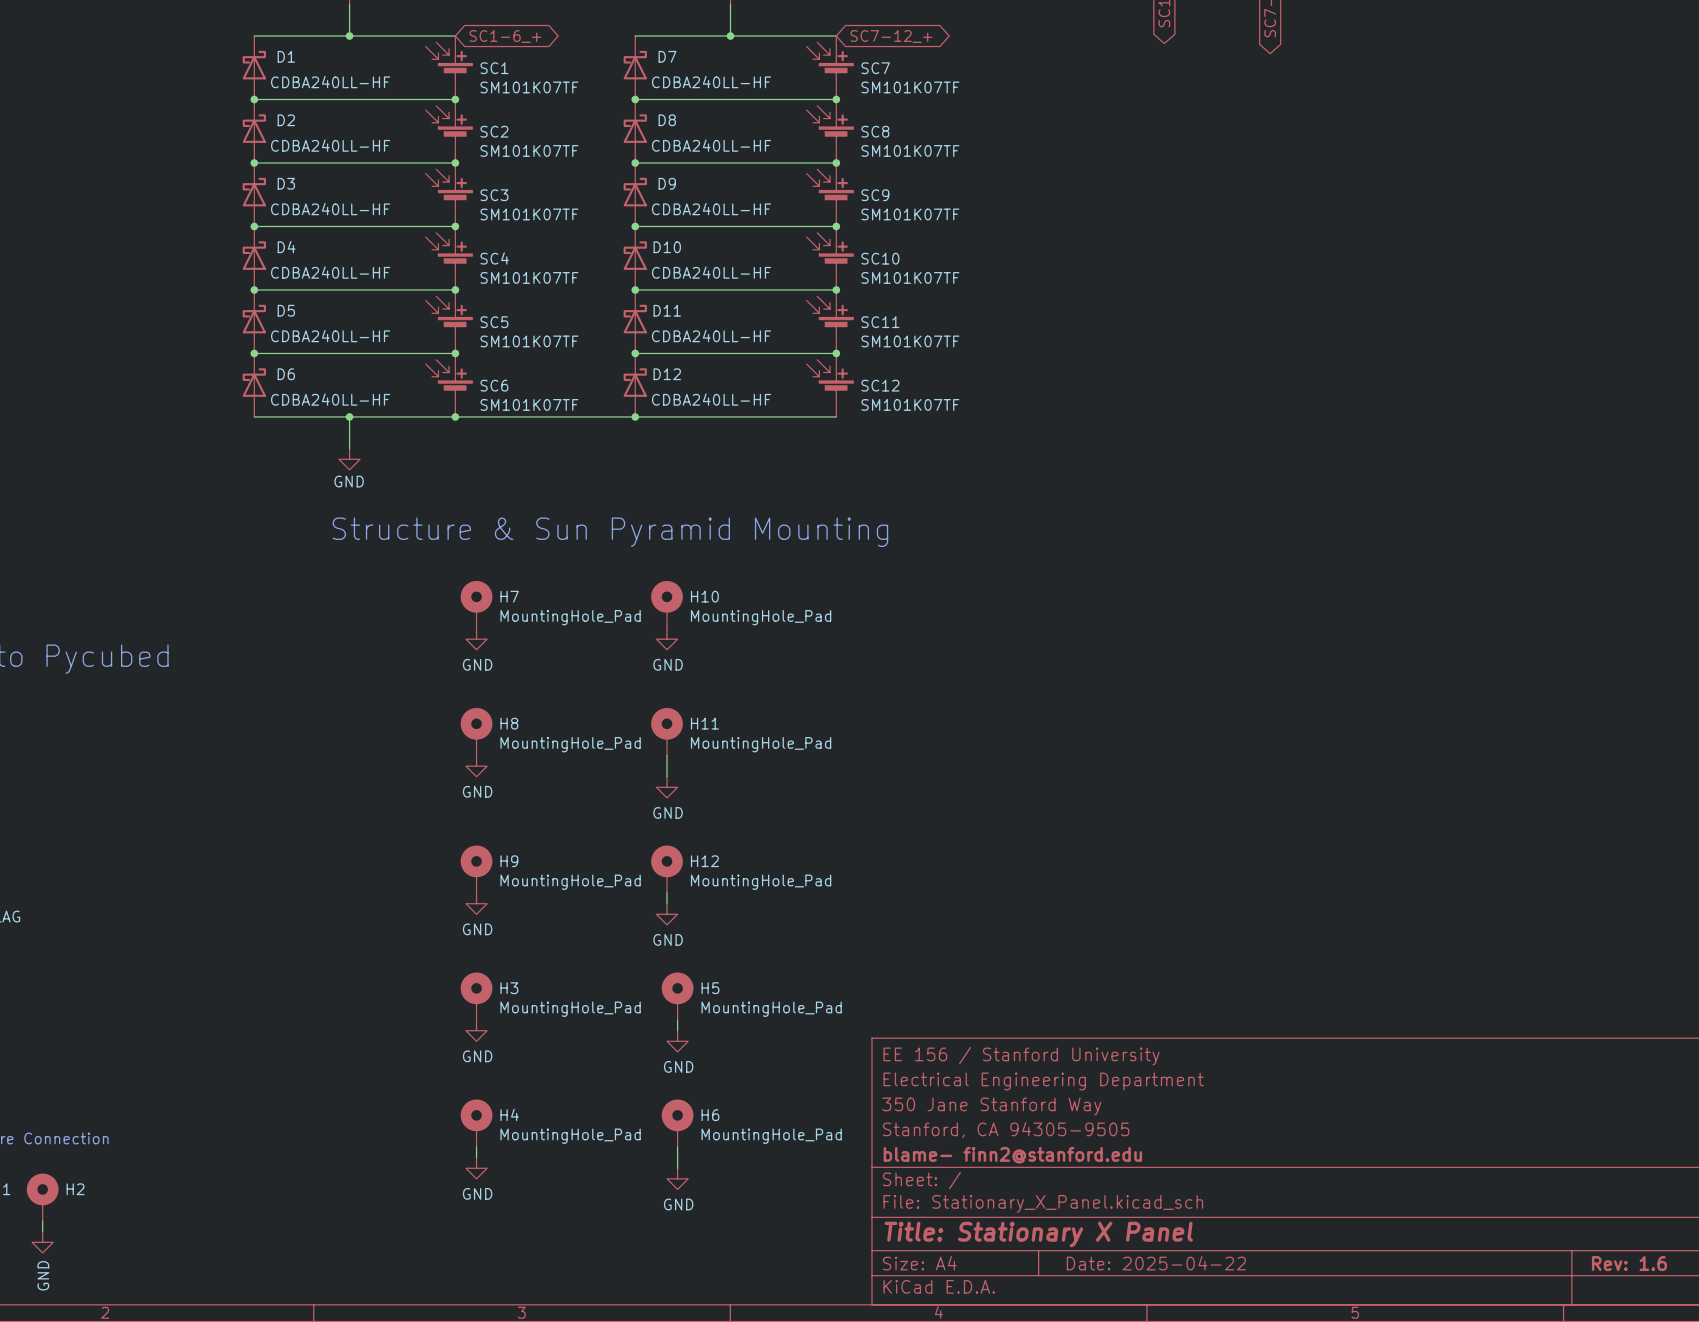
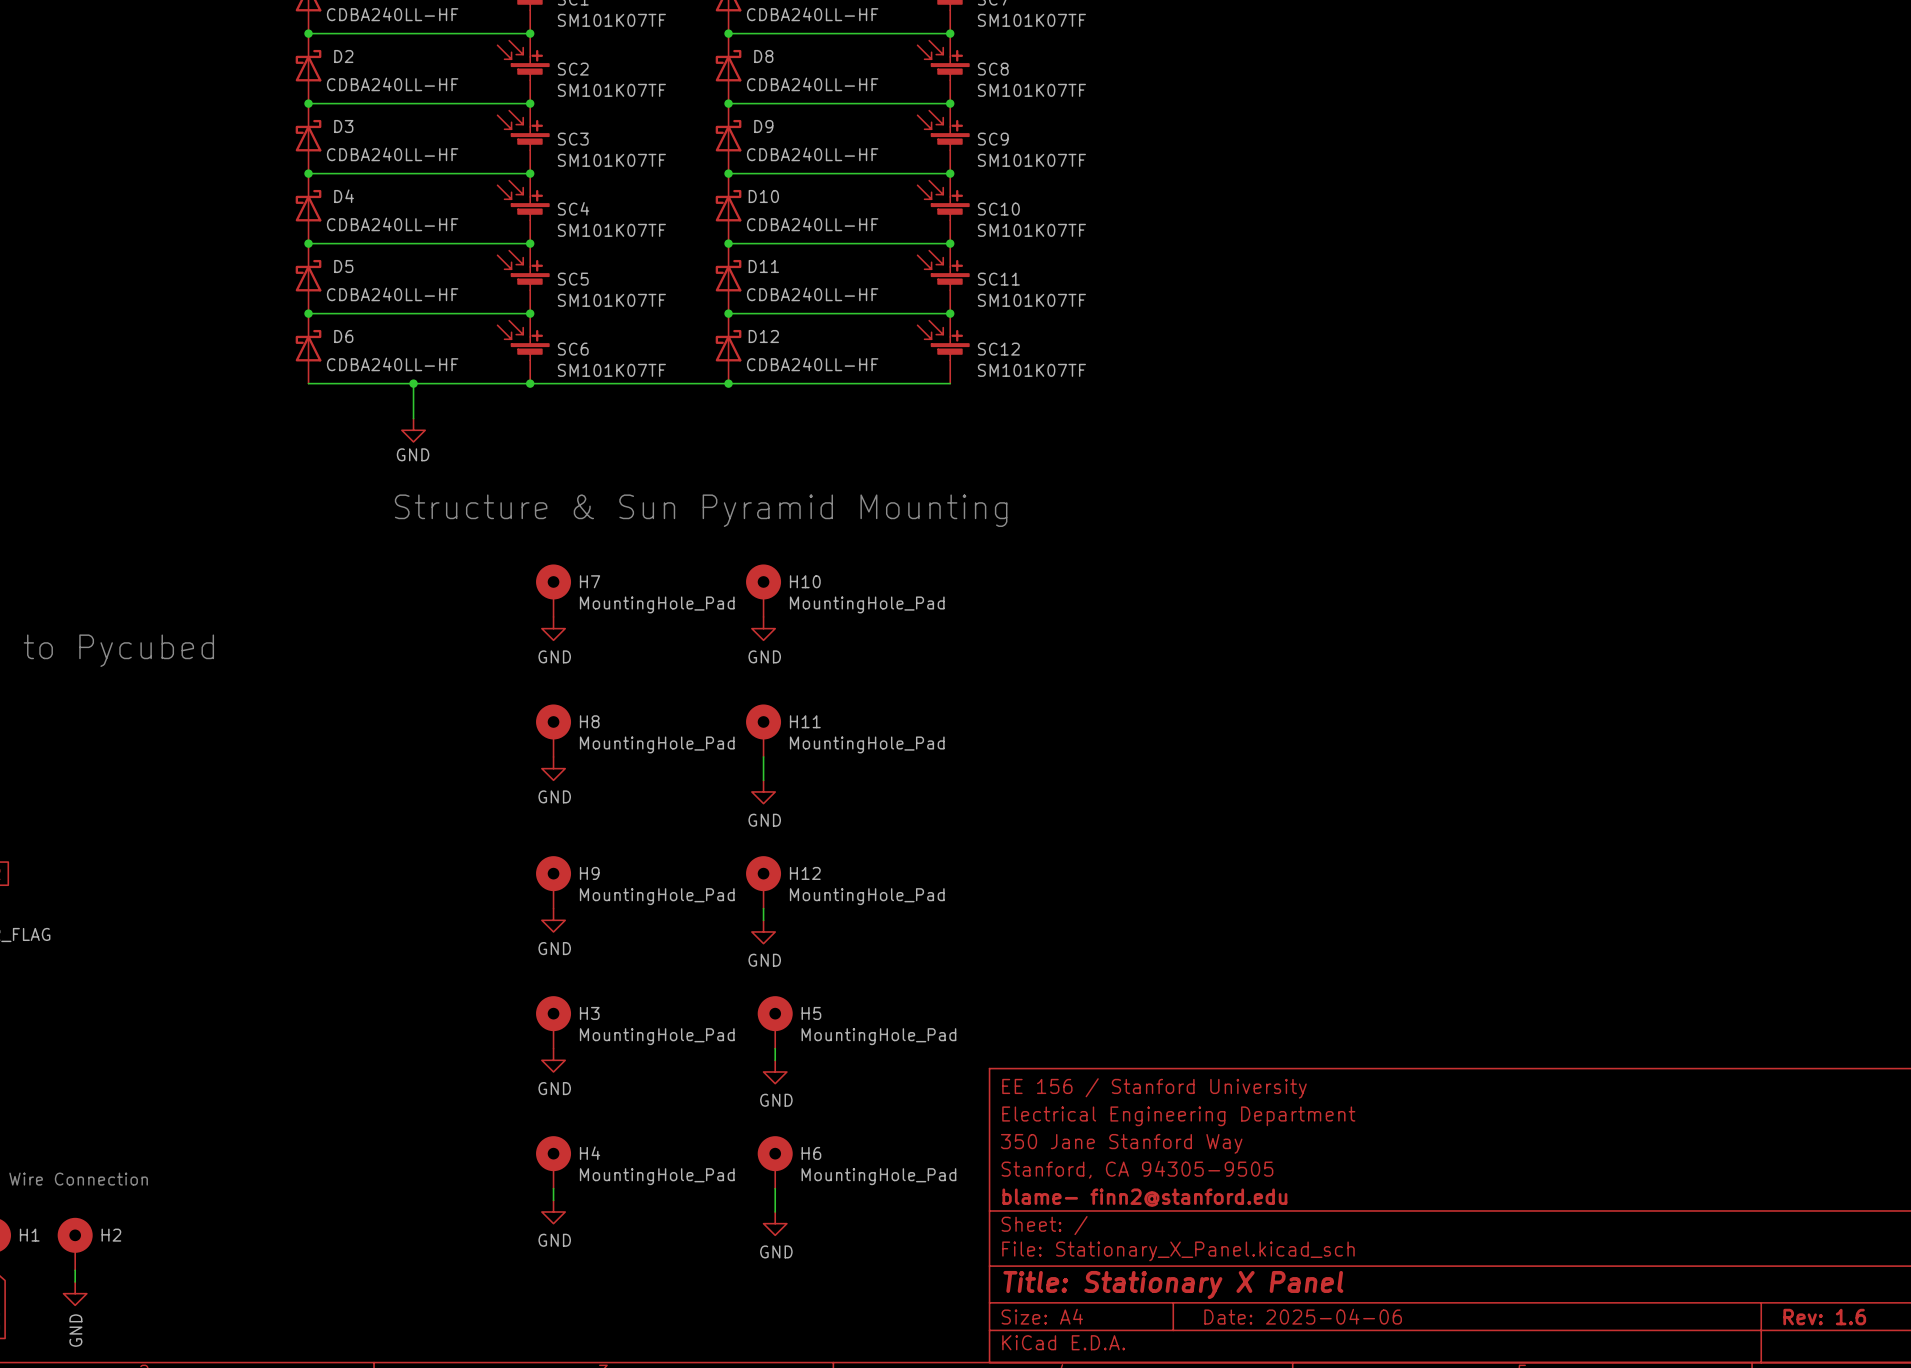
title block: Date: 2025-04-22 (1156, 1263) -> Date: 2025-04-06 (1303, 1316)

